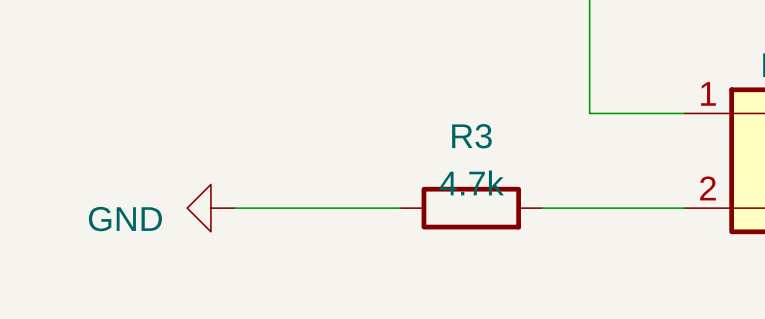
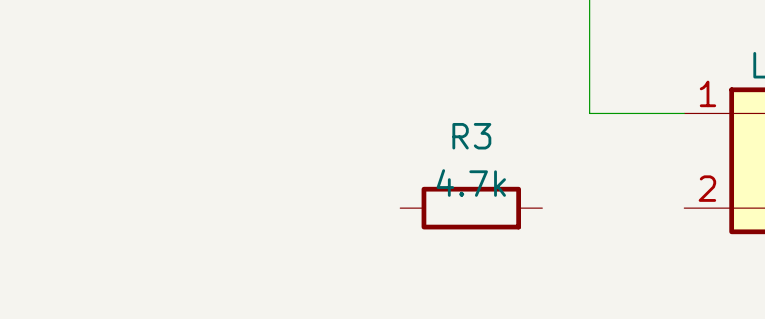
power symbol: GND (210, 208) -> none
wire: (234, 208) (400, 208) -> none
wire: (542, 208) (684, 208) -> none

